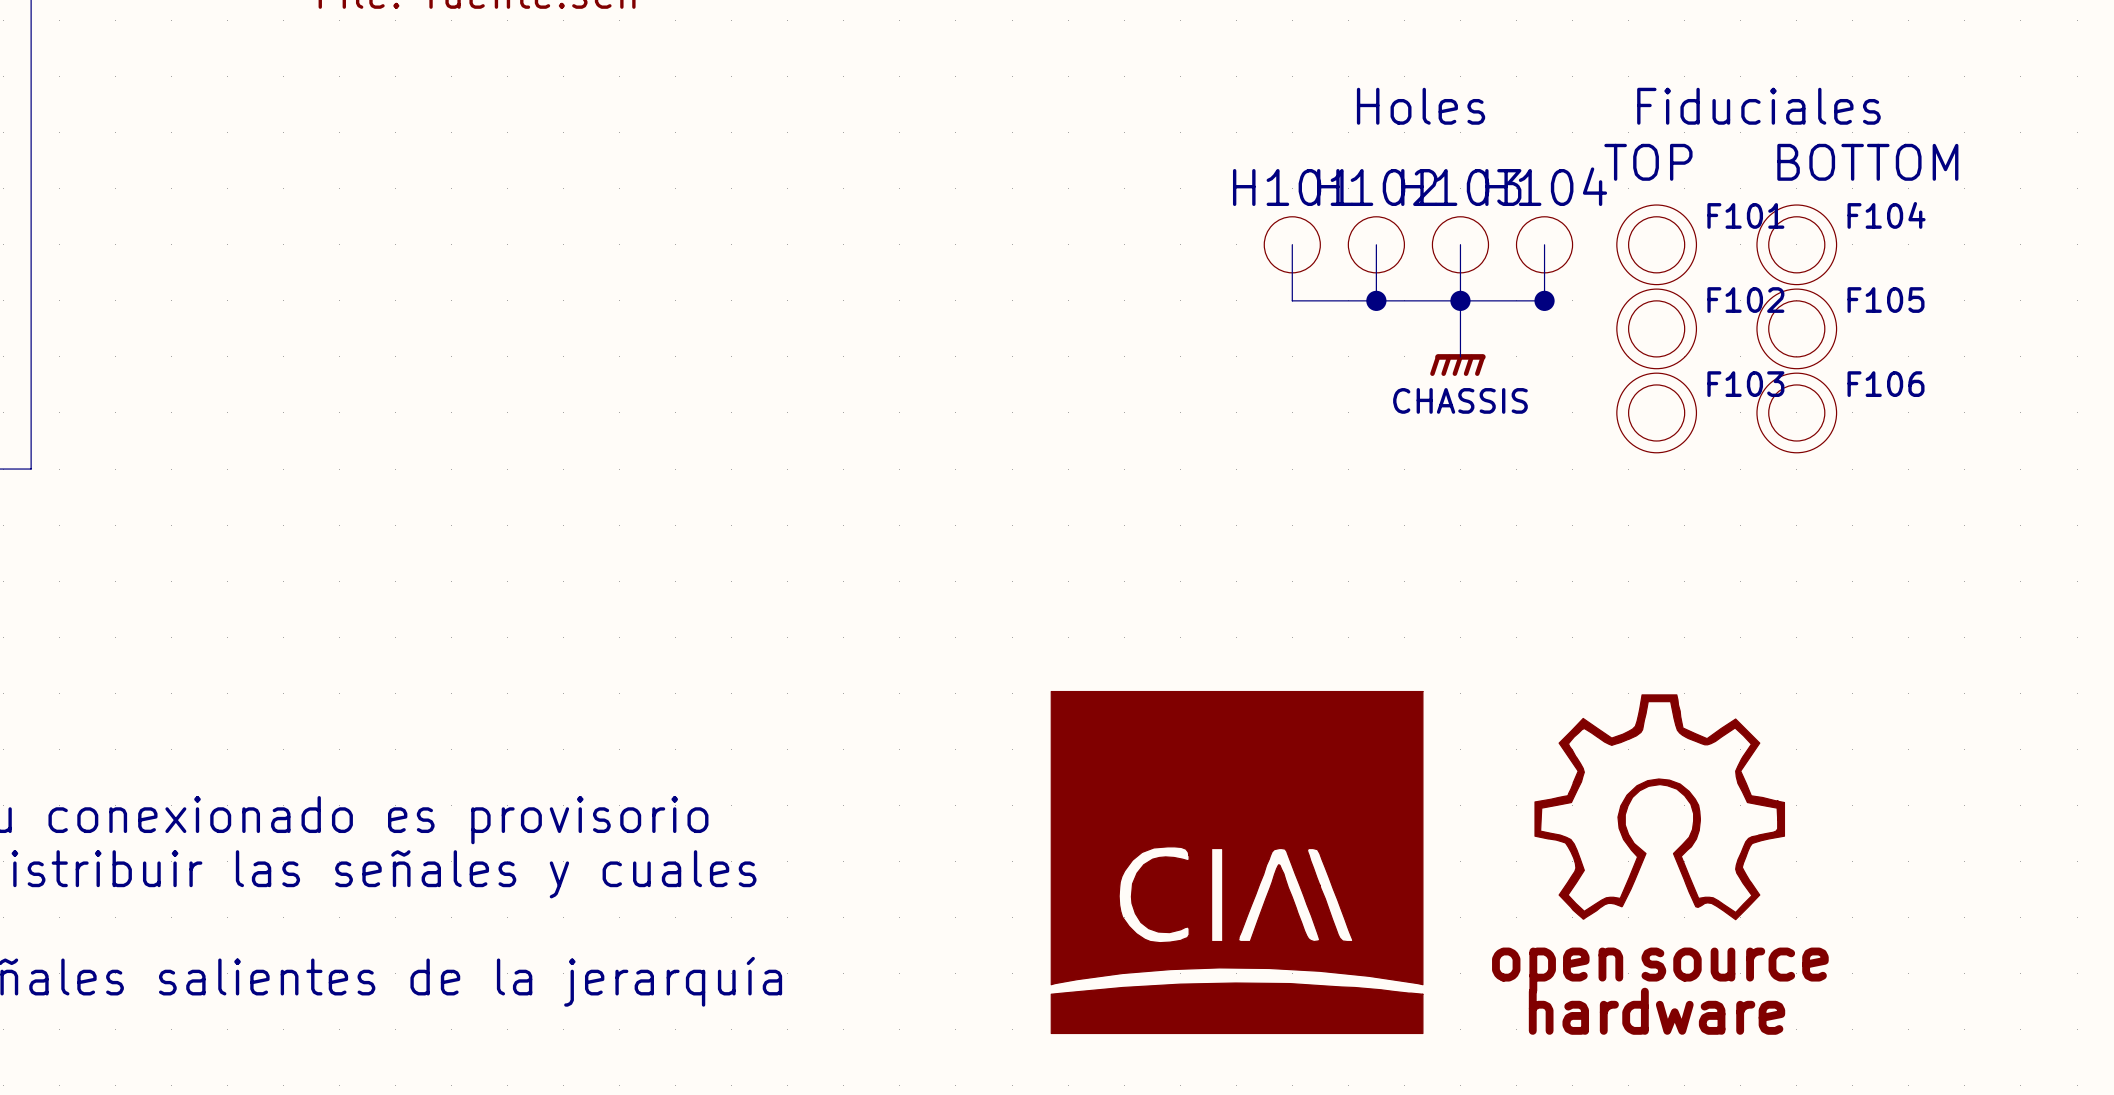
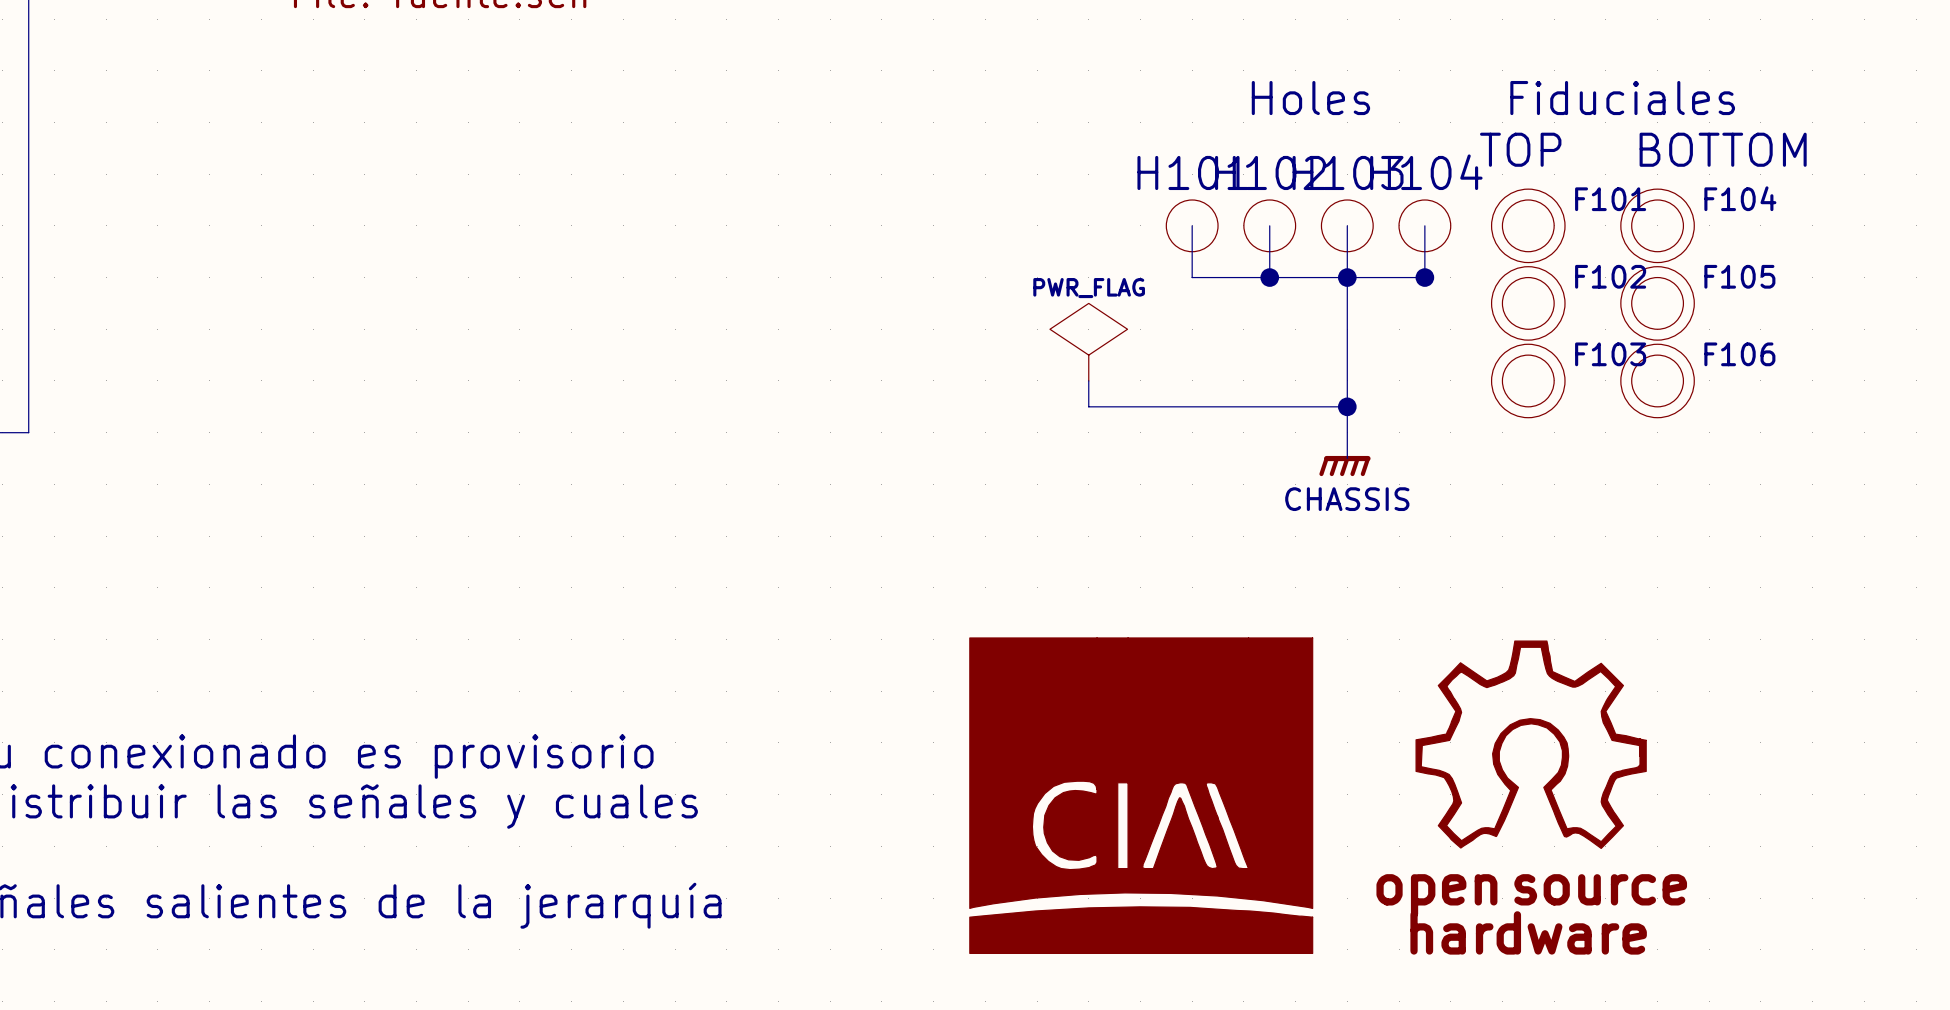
wire: none -> (1347, 329) (1347, 458)
power symbol position: CHASSIS (1457, 365) -> CHASSIS (1344, 466)
power symbol: none -> PWR_FLAG (1088, 342)
wire: none -> (1088, 380) (1088, 406) (1347, 406)
junction: none -> (1347, 406)

